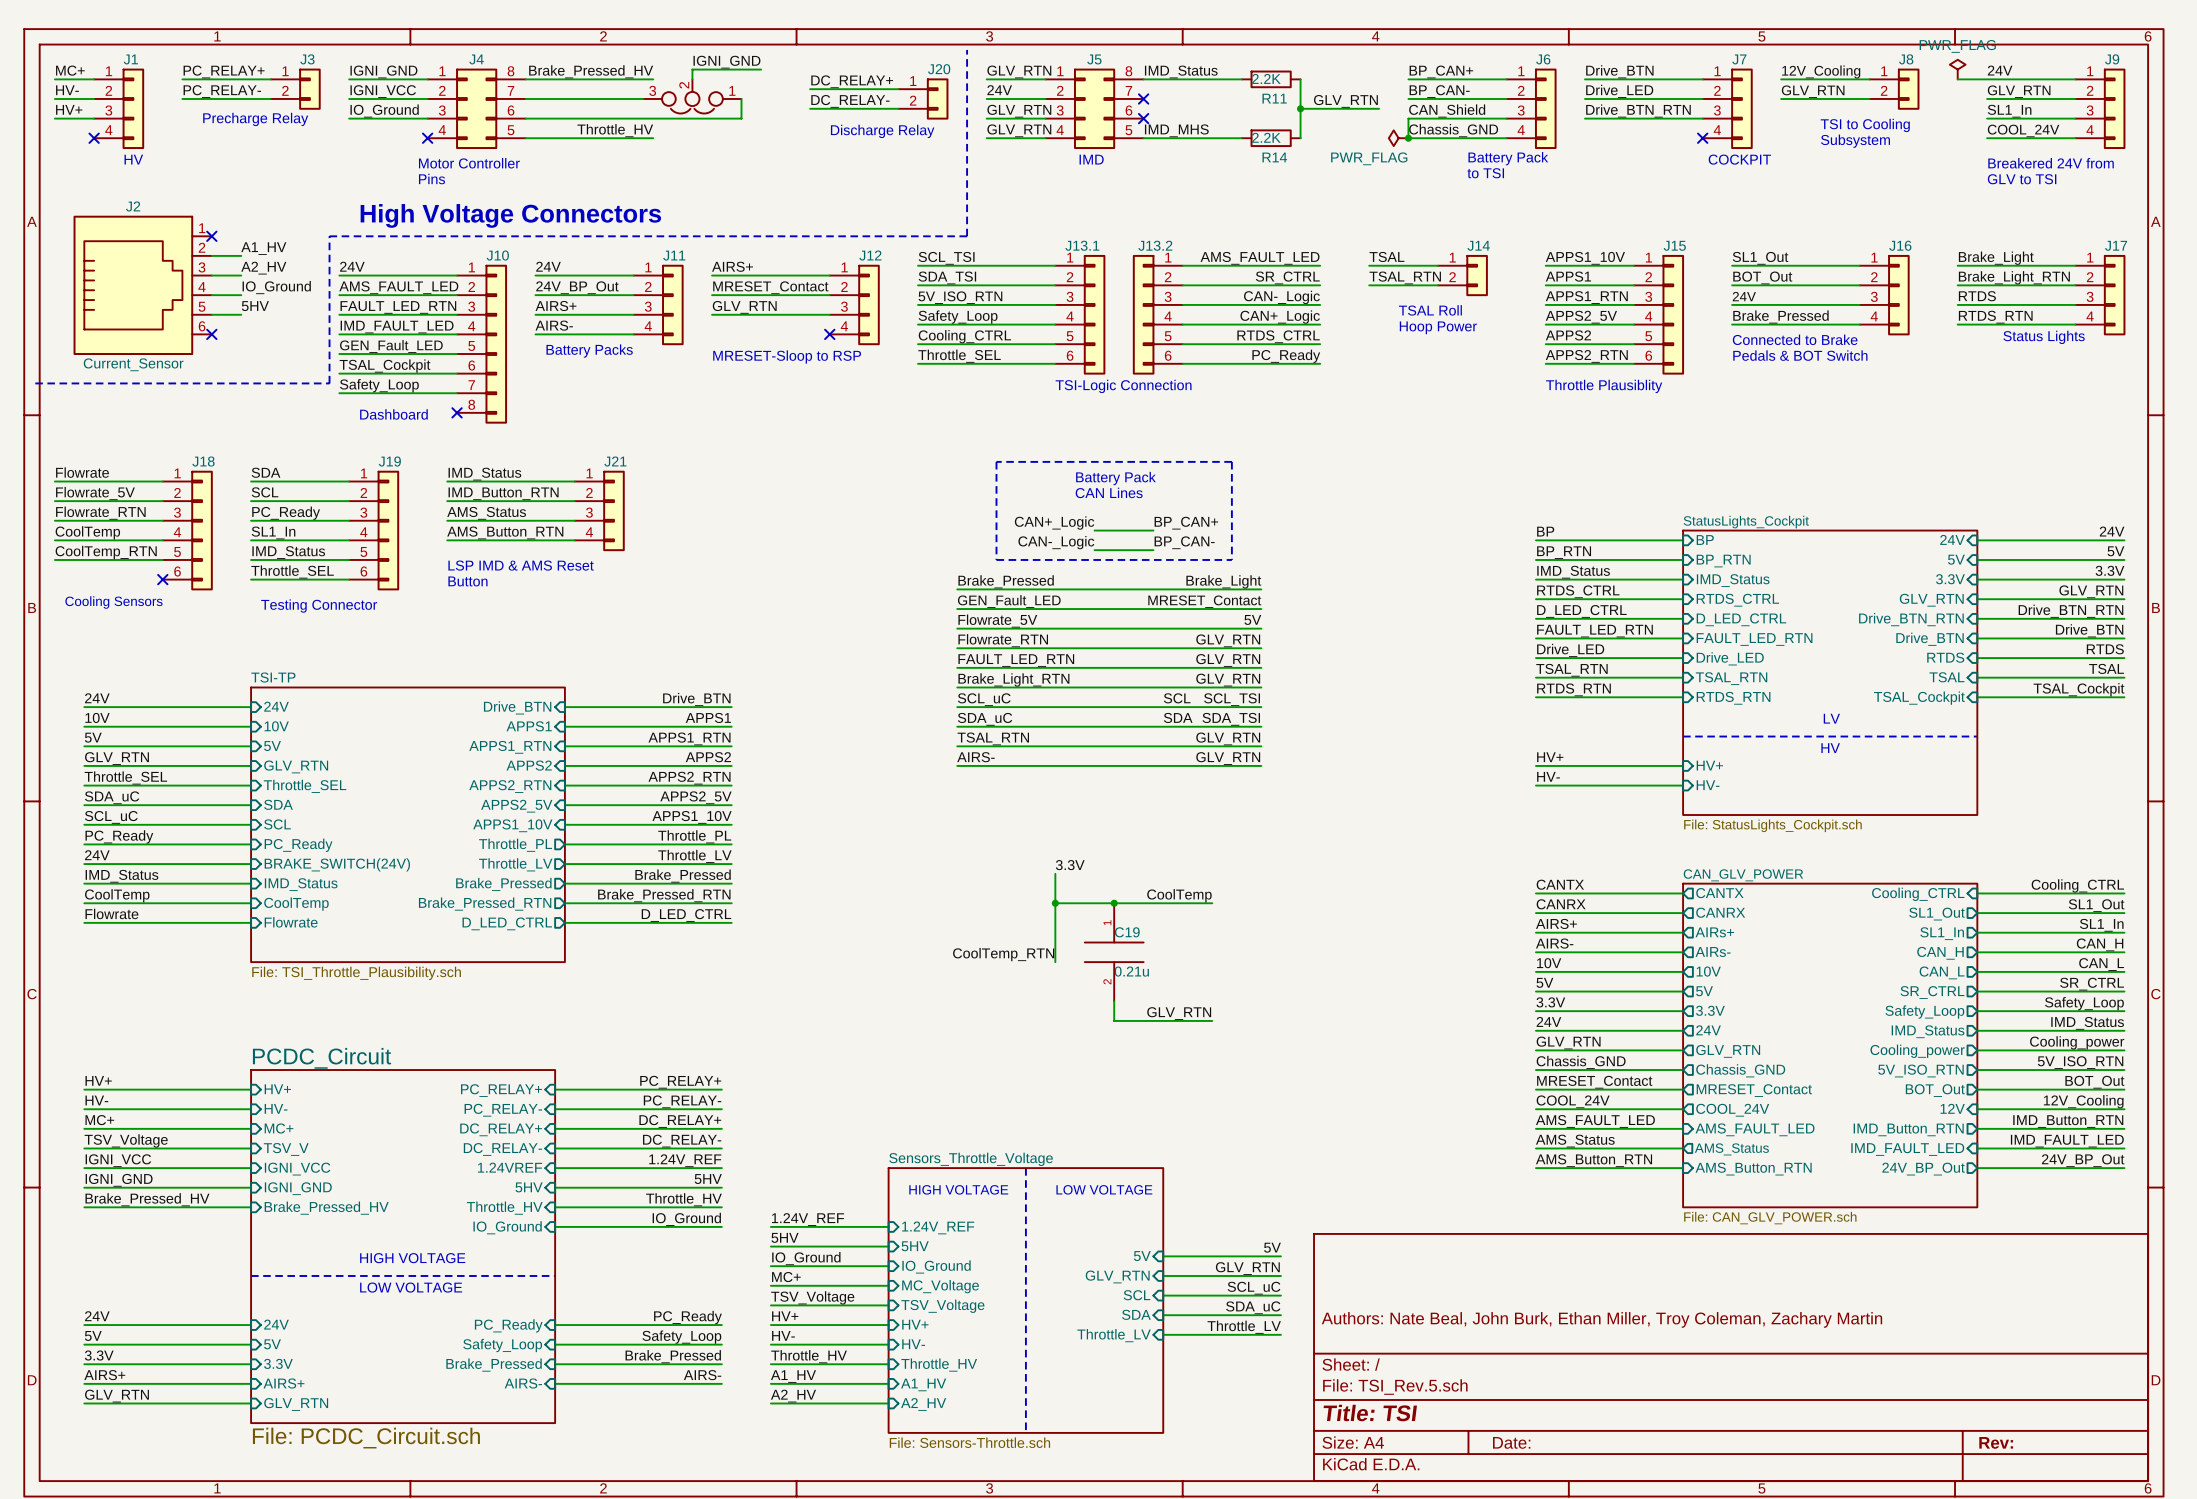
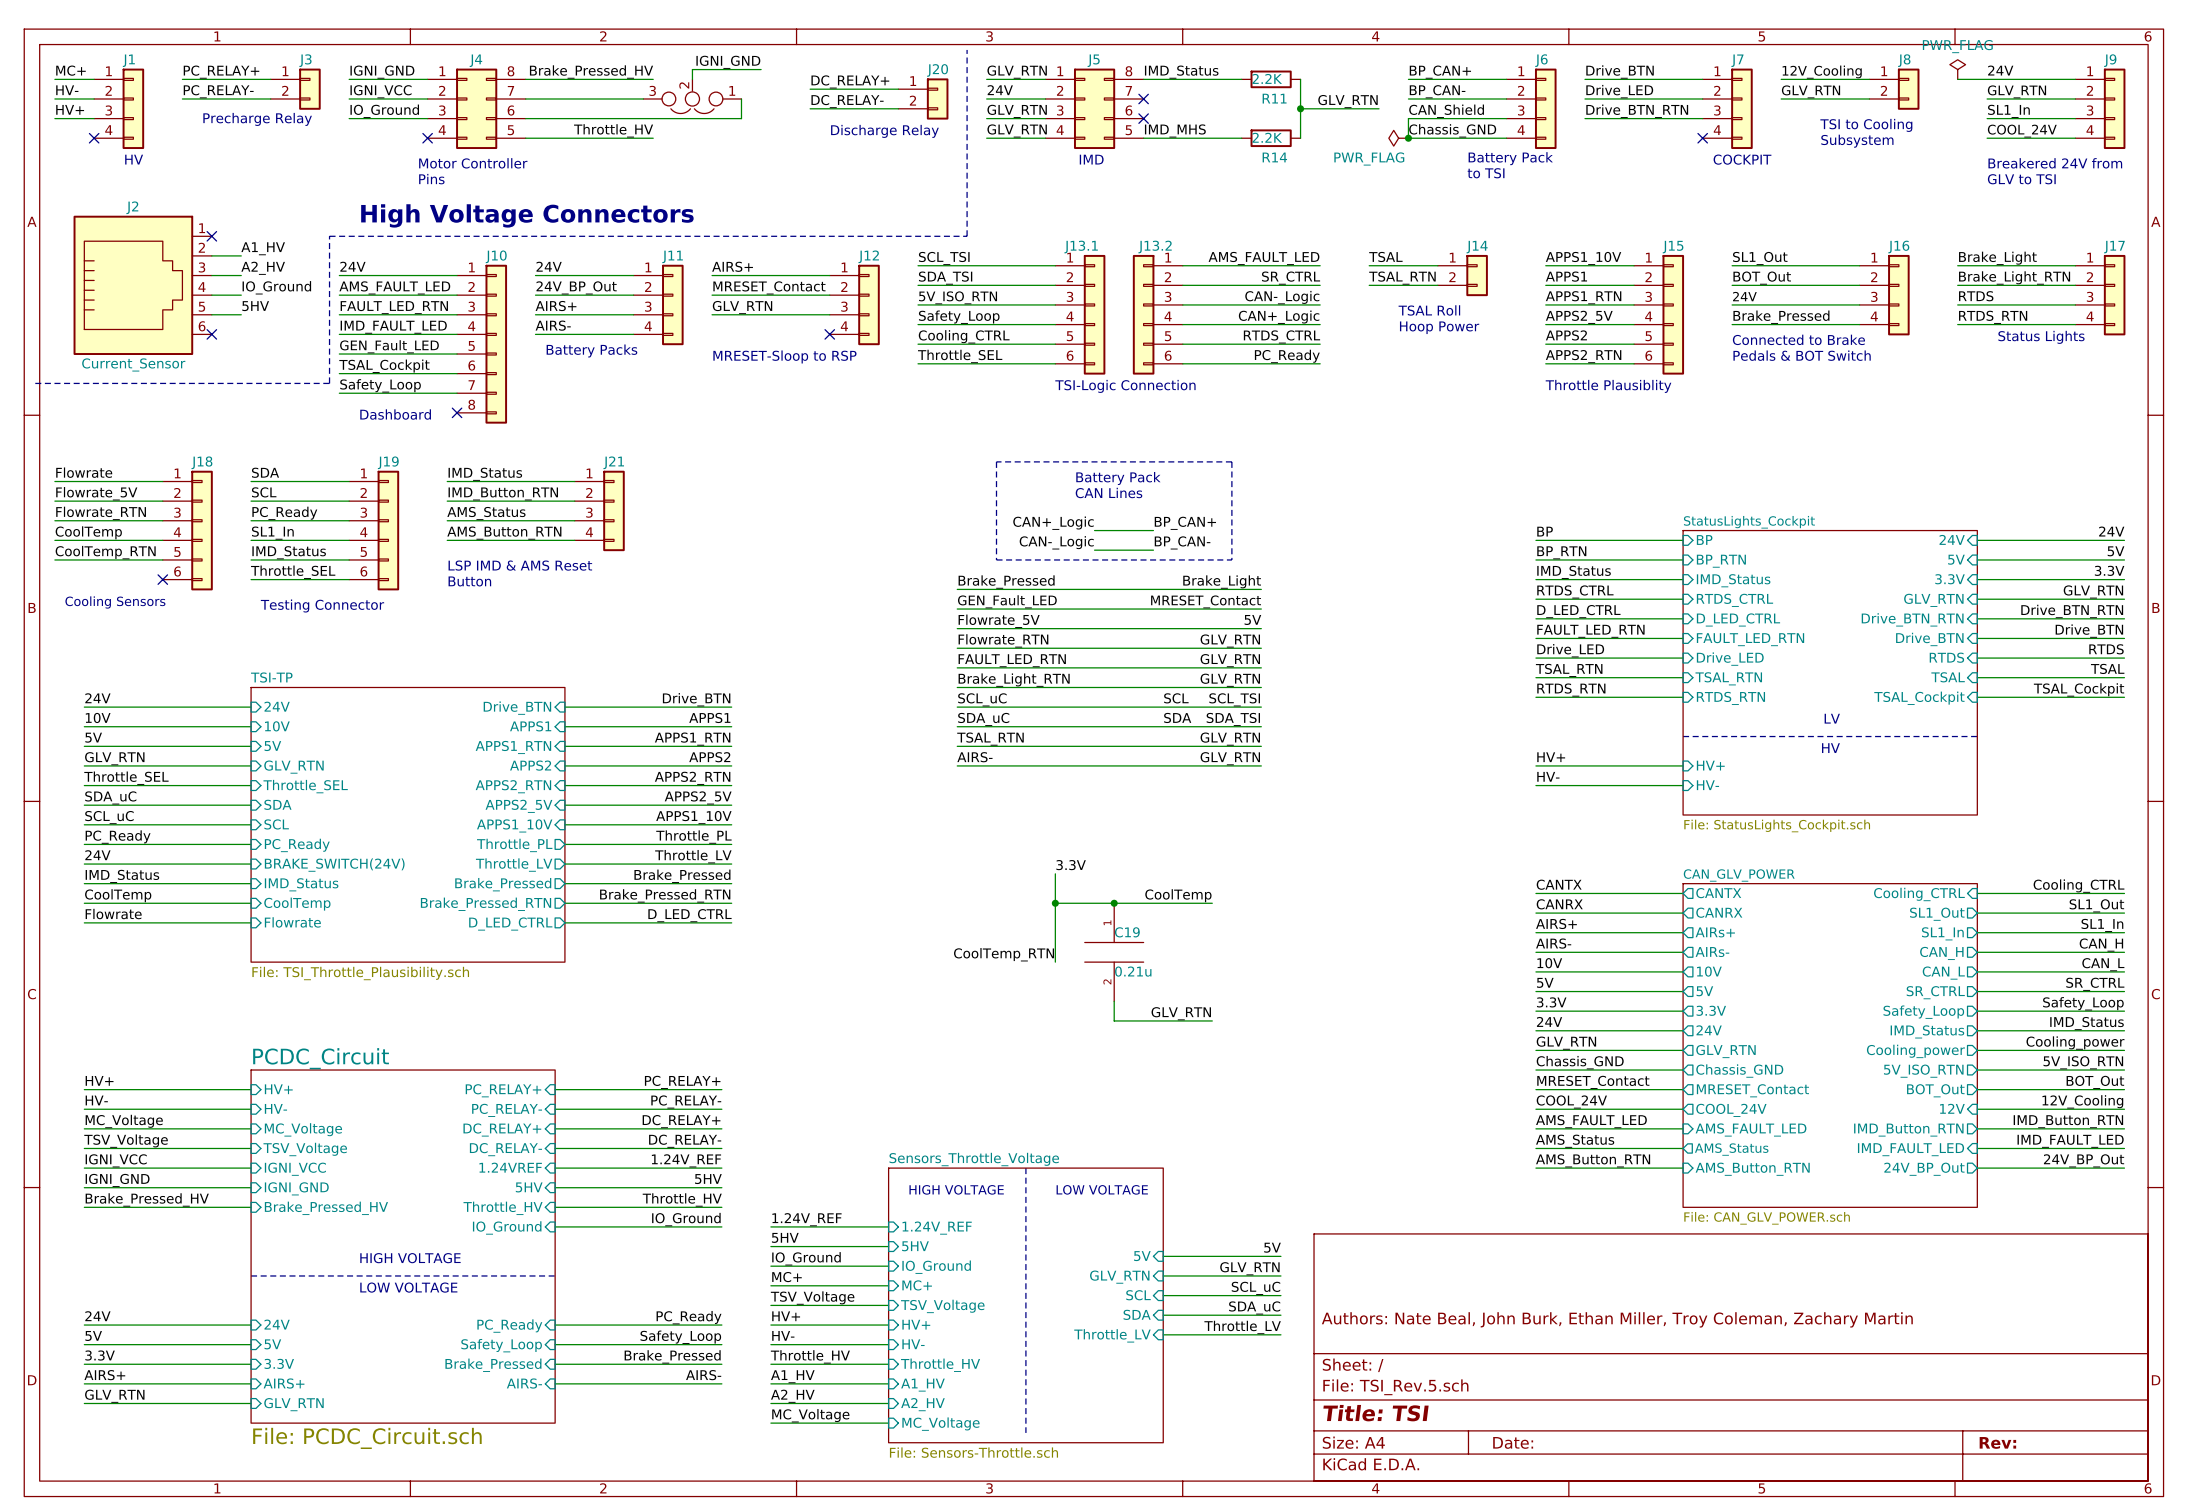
label: MC+ (99, 1120) -> MC_Voltage (124, 1121)
sheet pin: MC+ (279, 1128) -> MC_Voltage (303, 1129)
sheet pin: TSV_V (286, 1149) -> TSV_Voltage (305, 1149)
sheet Sensors_Throttle_Voltage shape: [888, 1168, 1164, 1433] -> [888, 1168, 1164, 1443]
sheet pin: MC_Voltage (940, 1286) -> MC+ (917, 1285)
label: none -> MC_Voltage (810, 1415)
wire: none -> (770, 1423) (888, 1423)
sheet pin: none -> MC_Voltage (940, 1424)

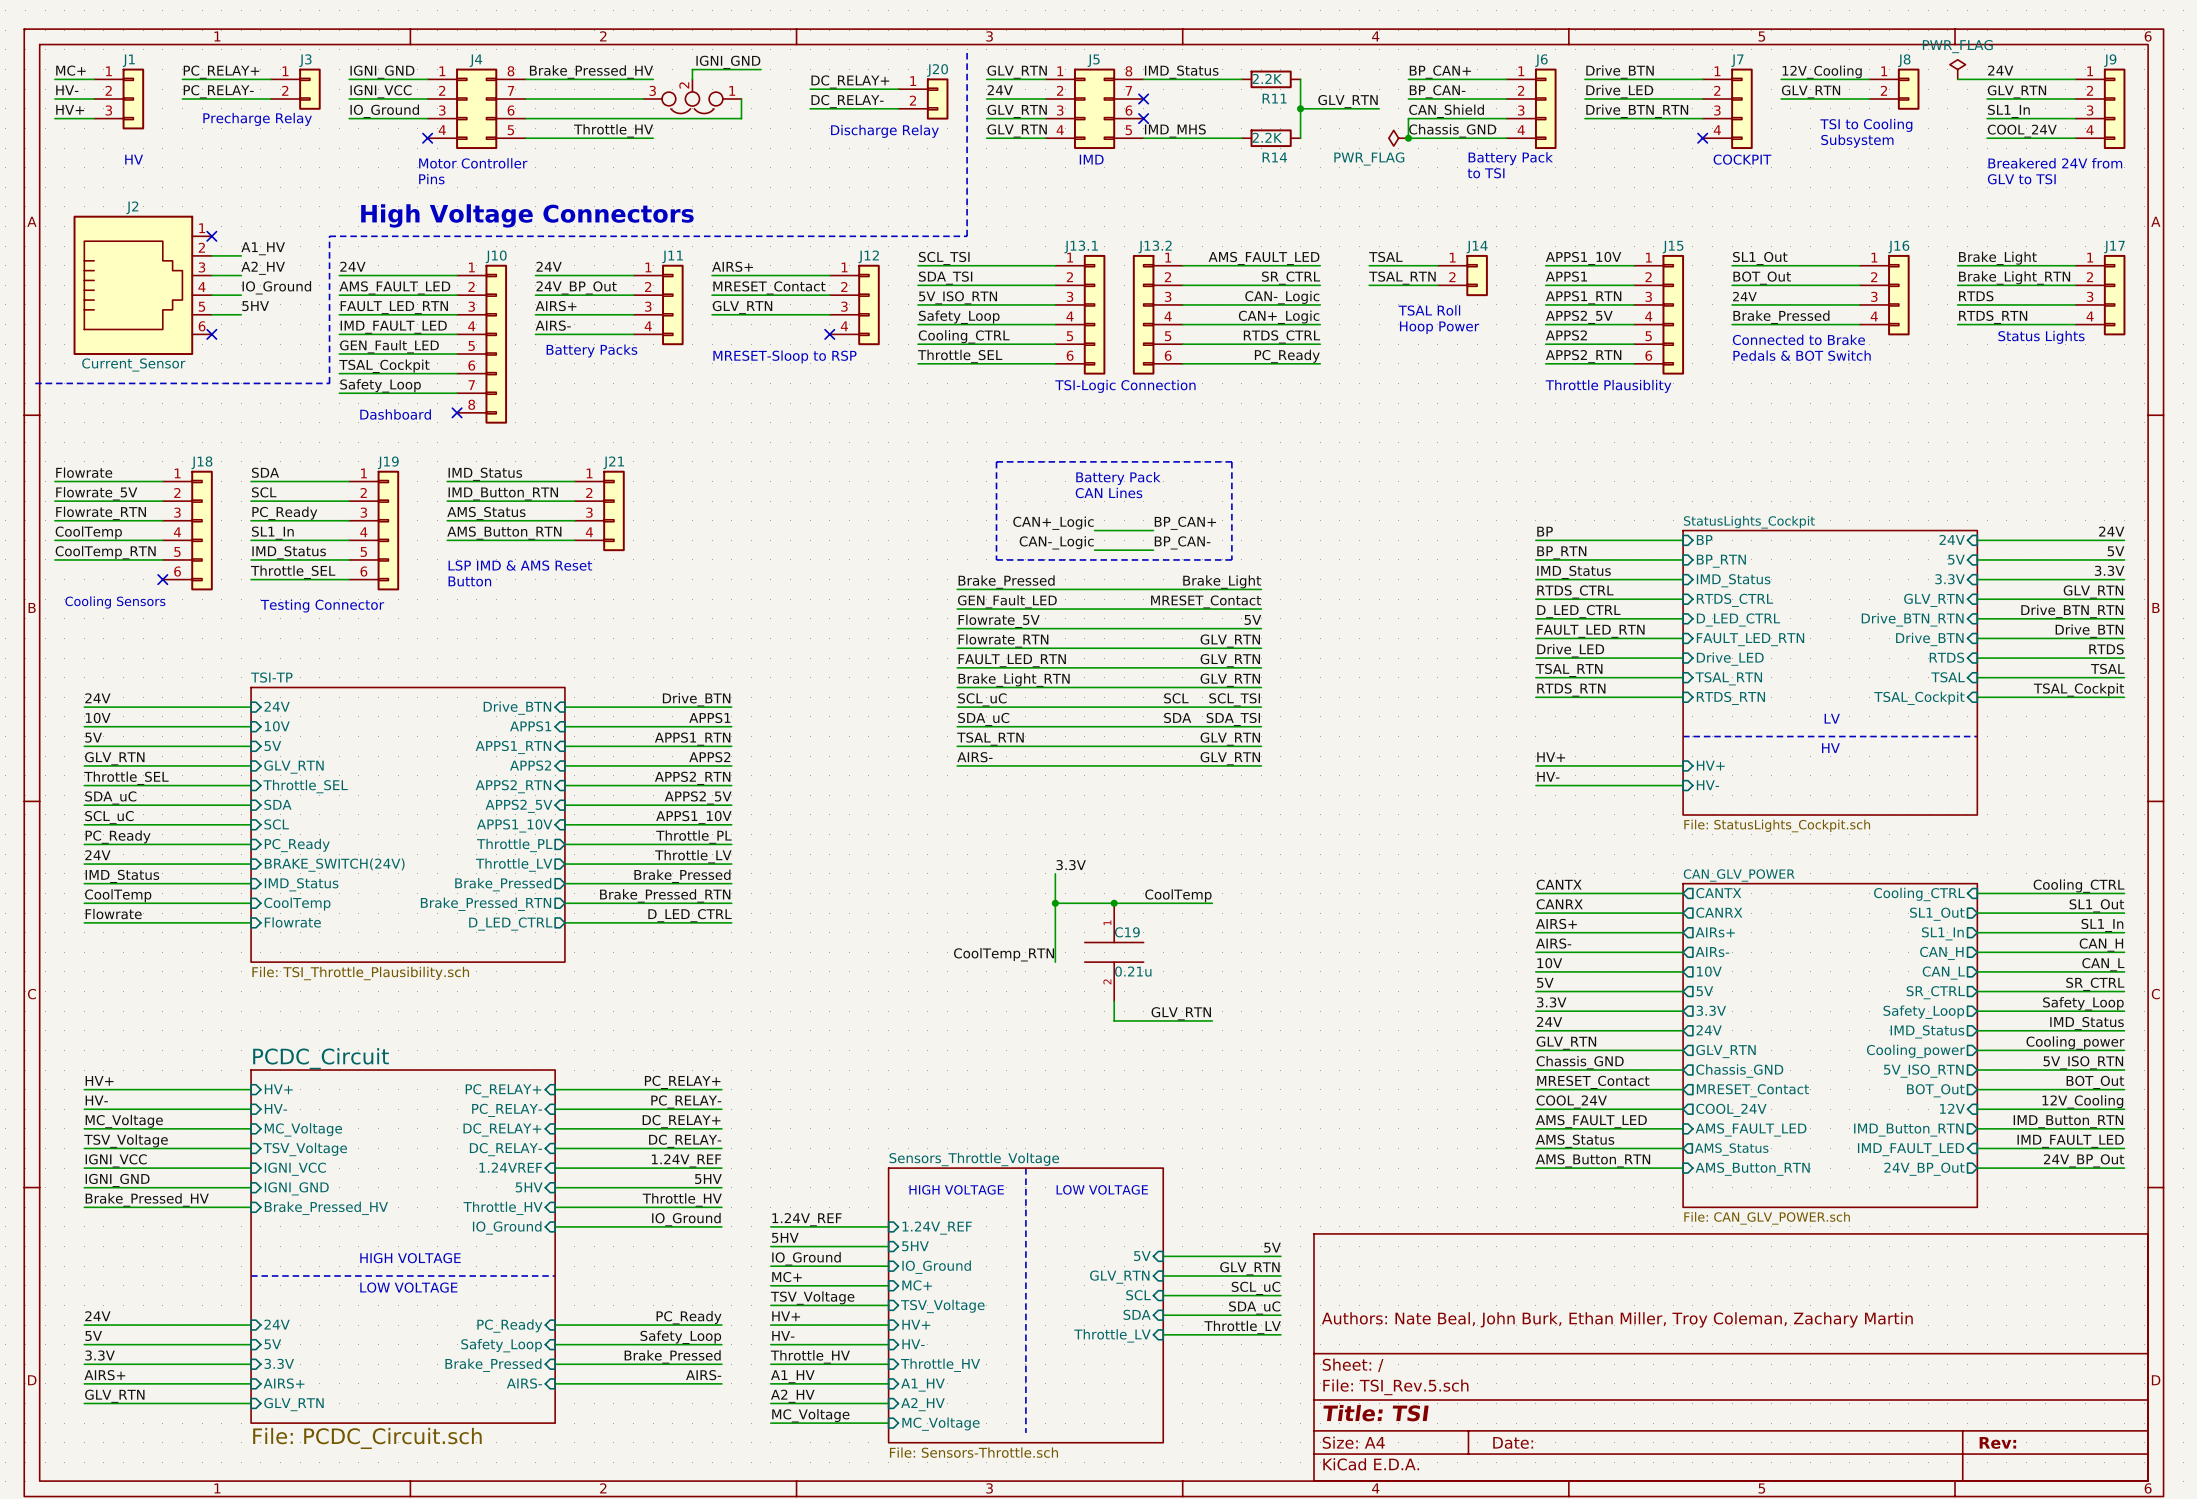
J1 symbol: [94, 68, 145, 150] -> [94, 68, 145, 130]
no-connect mark: (94, 138) -> none

